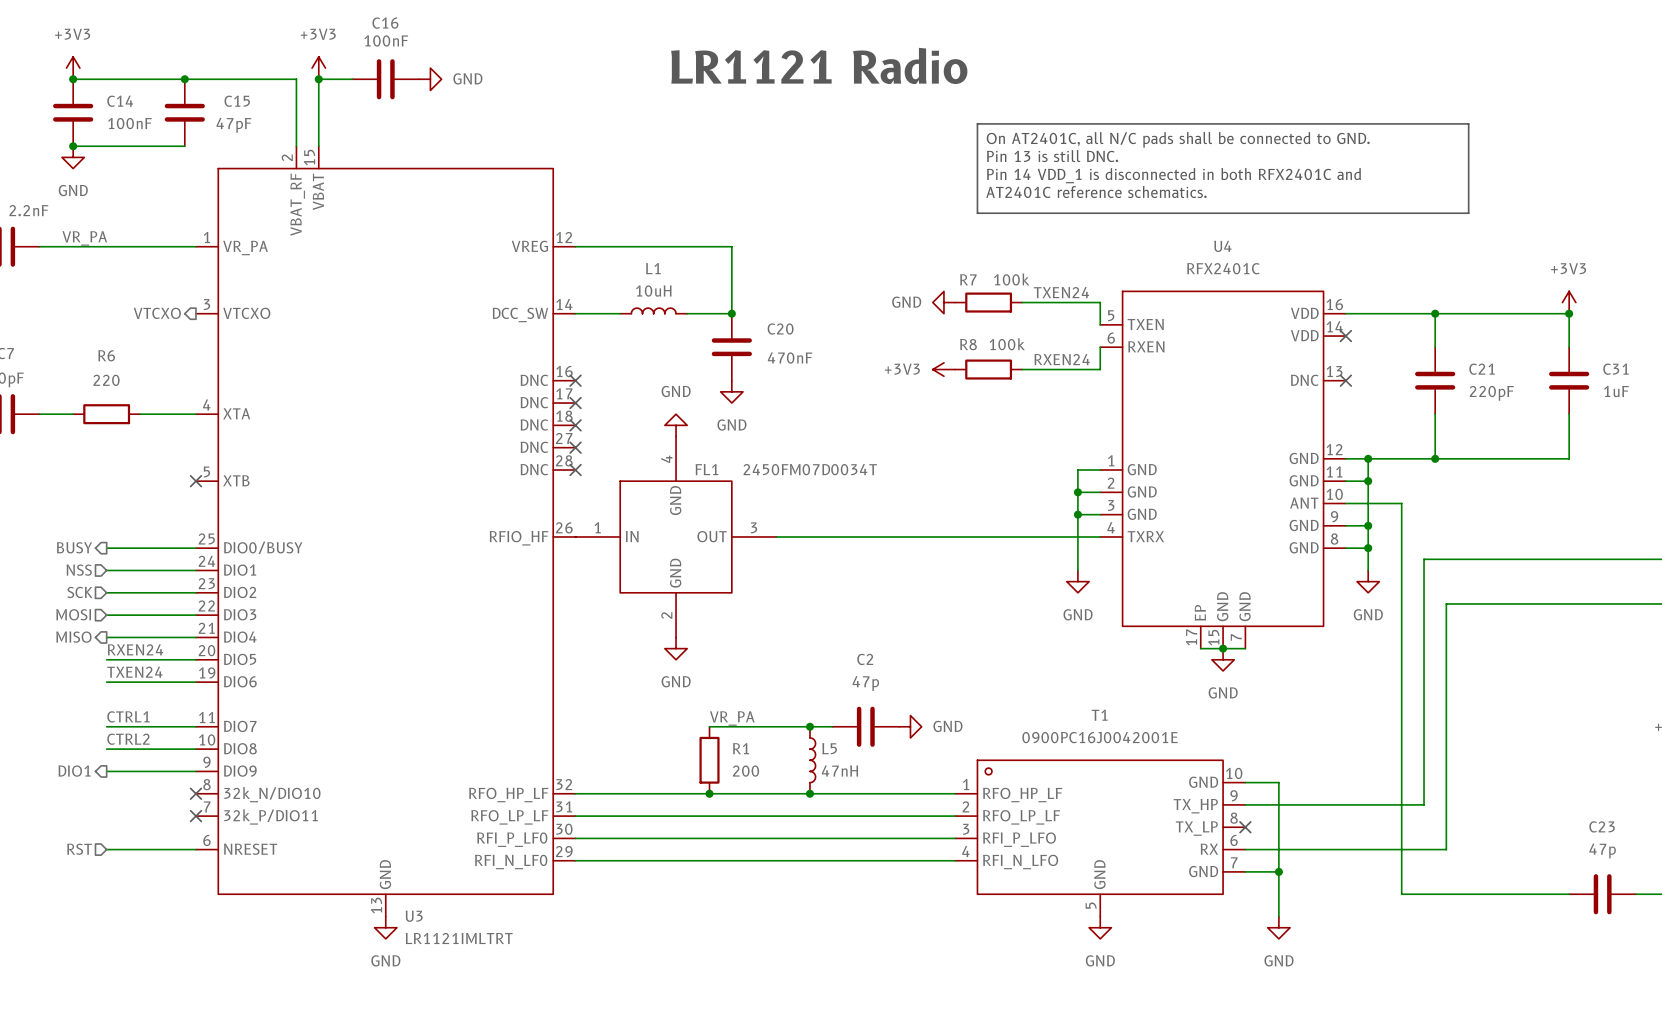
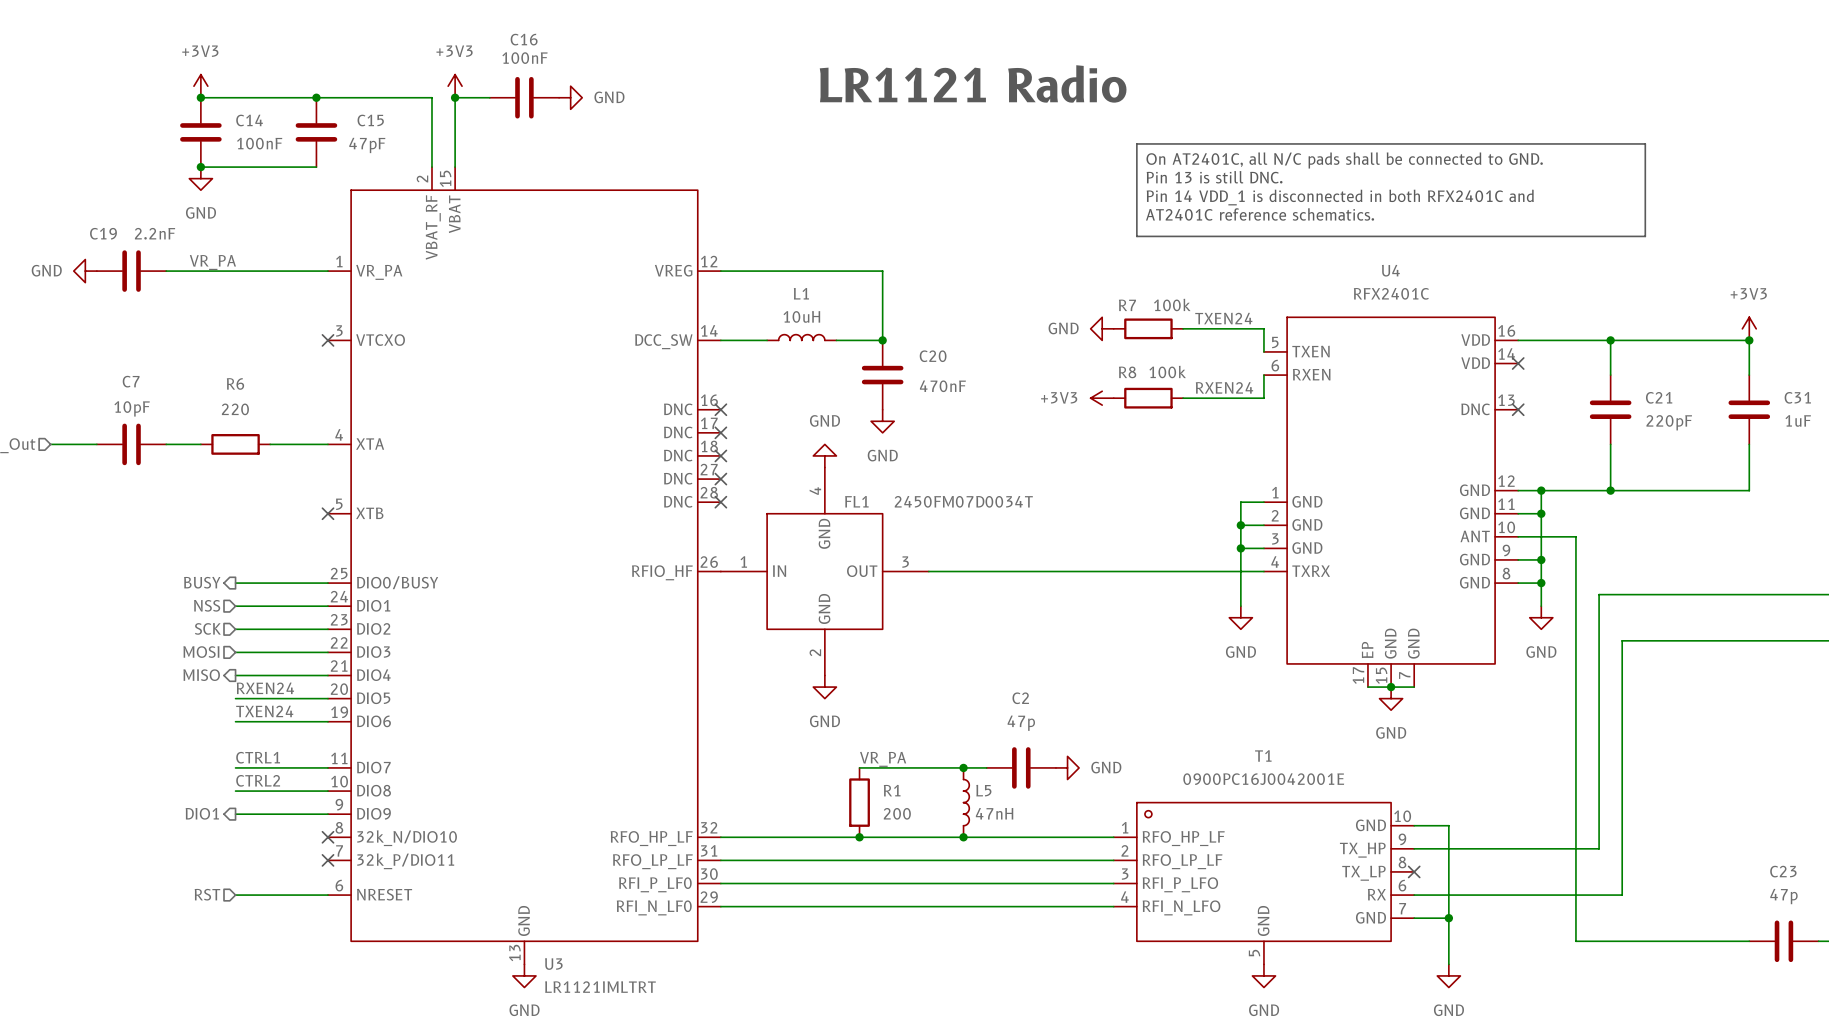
hierarchical label: VTCXO (157, 313) -> none
no-connect mark: none -> (327, 340)

